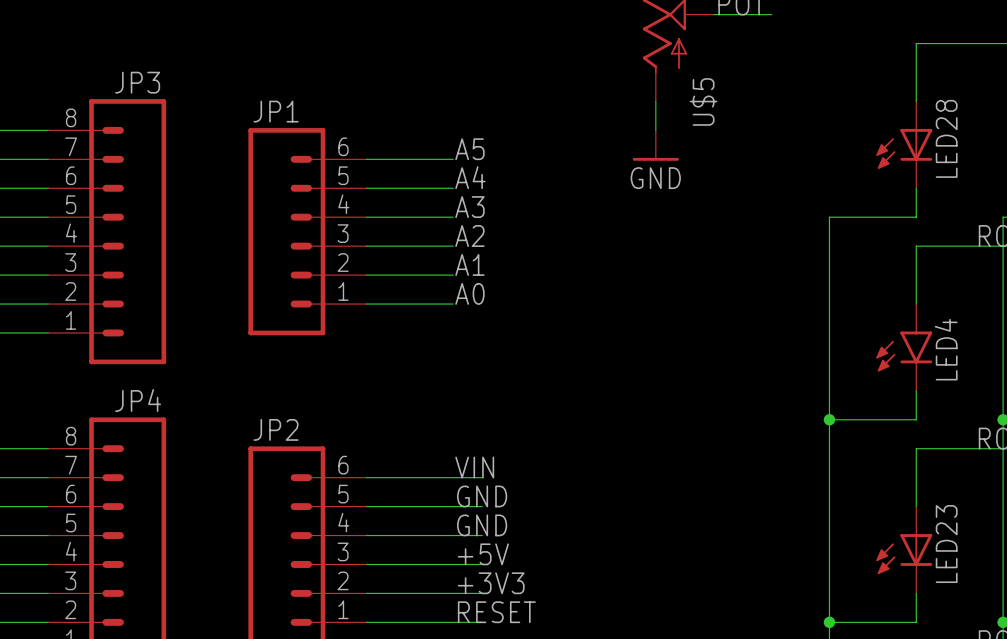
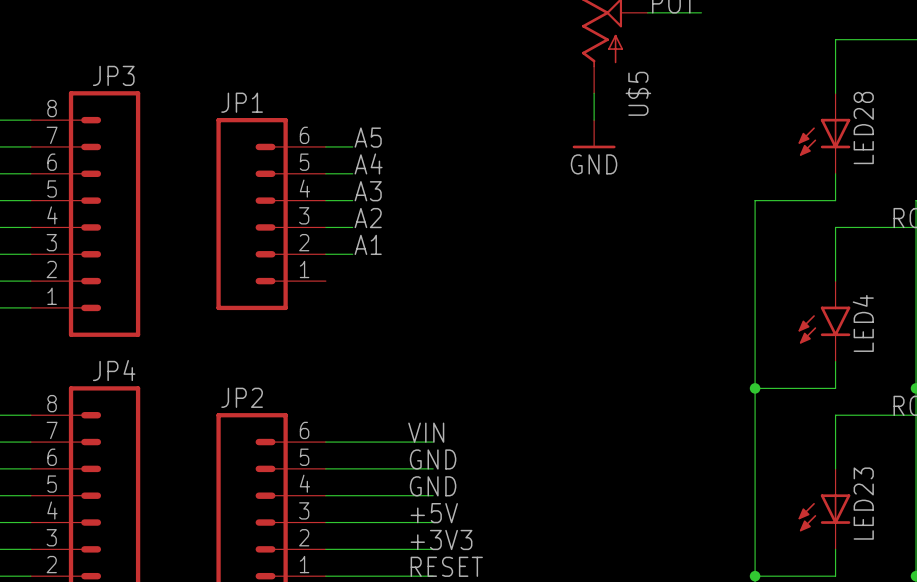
label position: A5 (469, 149) -> A5 (368, 137)
wire: (395, 159) (453, 159) -> none
label position: A4 (470, 177) -> A4 (368, 163)
wire: (395, 188) (453, 188) -> none
label position: A3 (469, 207) -> A3 (368, 191)
wire: (395, 217) (453, 217) -> none
label position: A2 (469, 236) -> A2 (368, 218)
wire: (395, 246) (453, 246) -> none
label position: A1 (469, 264) -> A1 (368, 244)
wire: (395, 275) (453, 275) -> none
label: A0 (469, 293) -> none
wire: (366, 304) (453, 304) -> none

